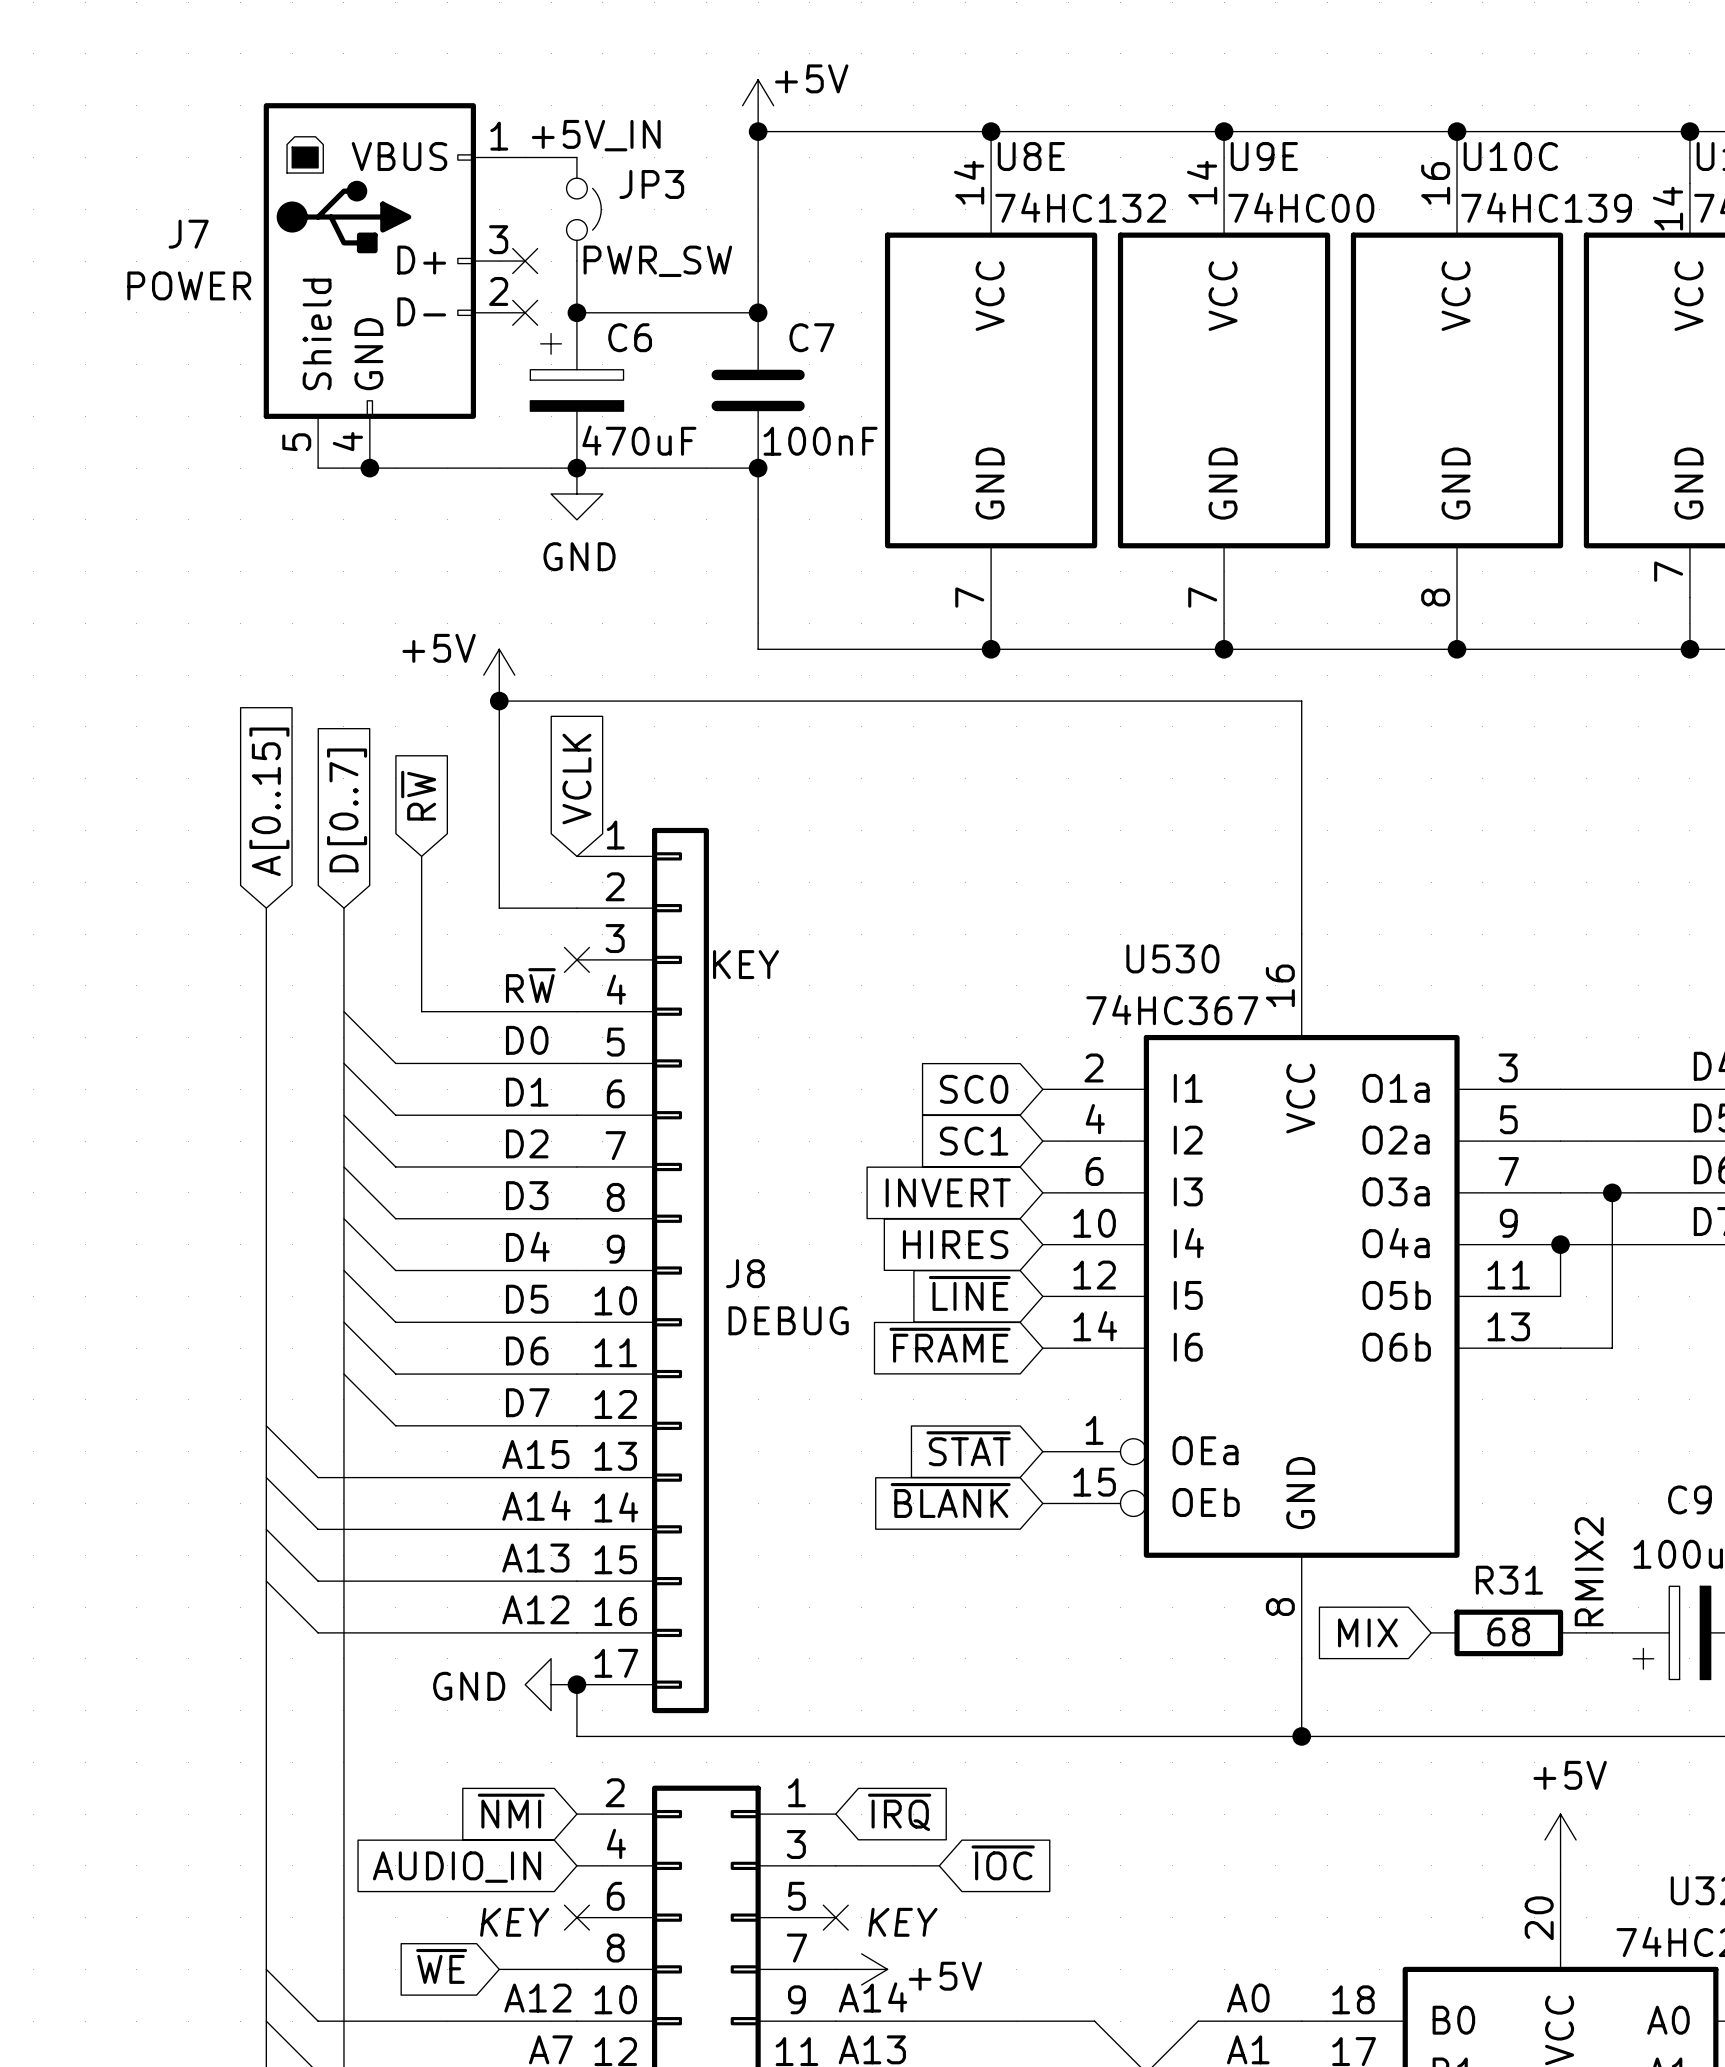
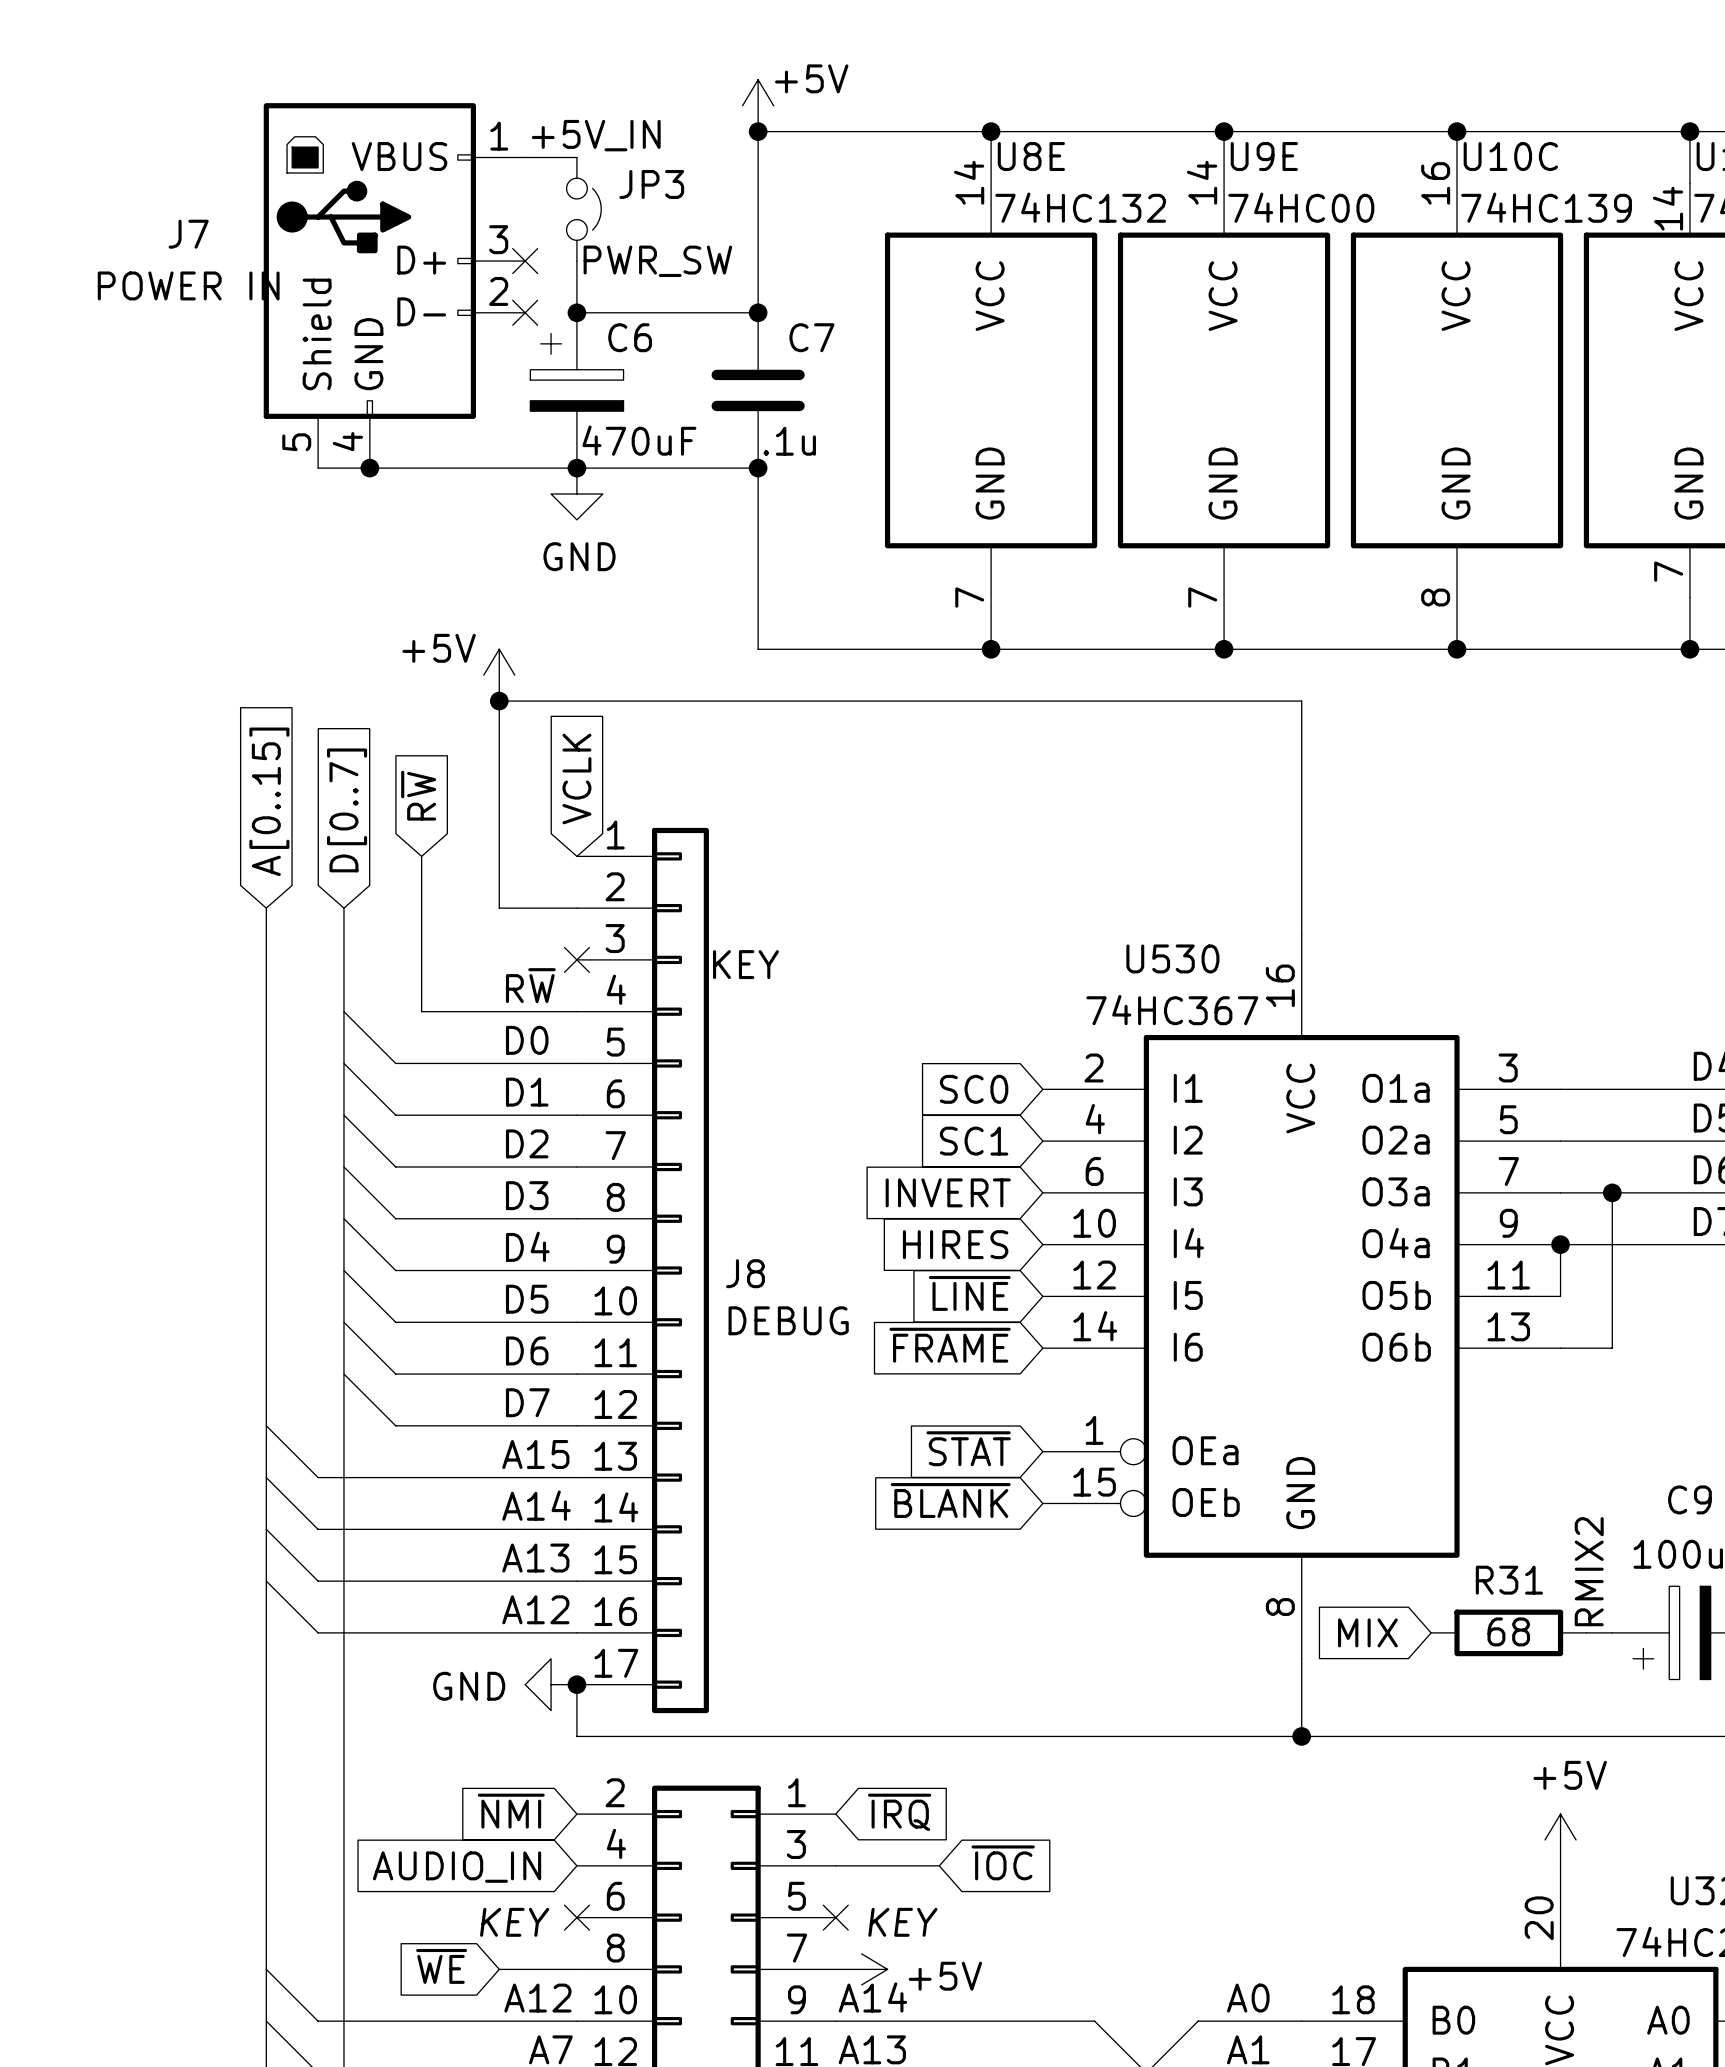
J7 value: POWER (189, 285) -> POWER IN (188, 285)
C7 value: 100nF (820, 441) -> .1u (789, 441)

